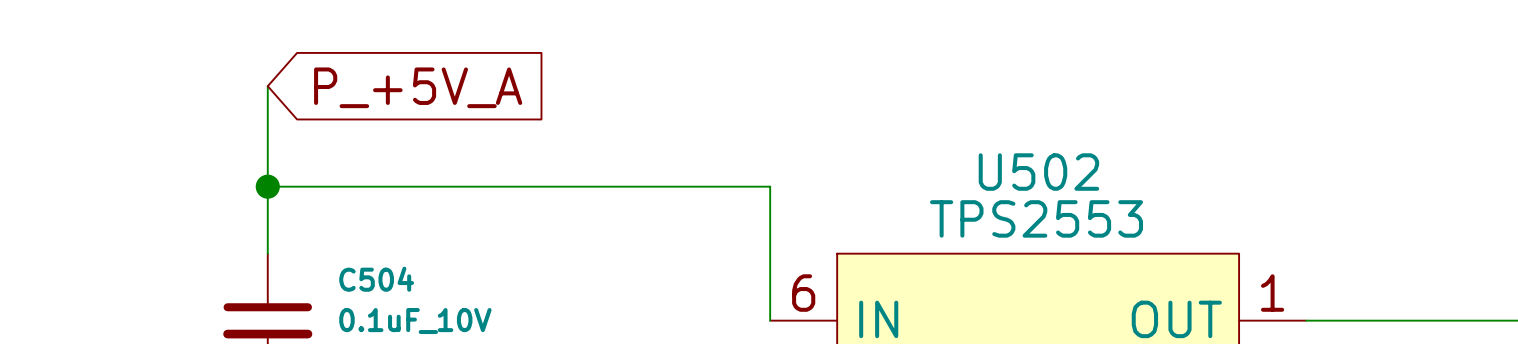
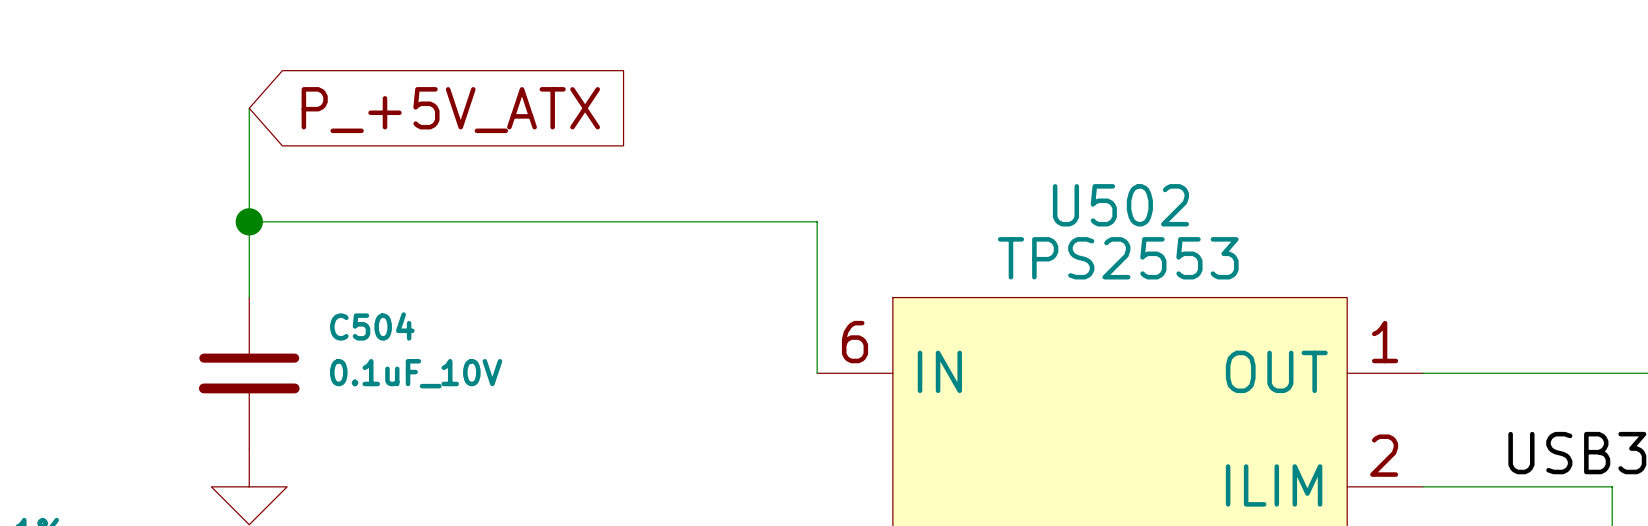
global label: P_+5V_A (418, 87) -> P_+5V_ATX (450, 110)

